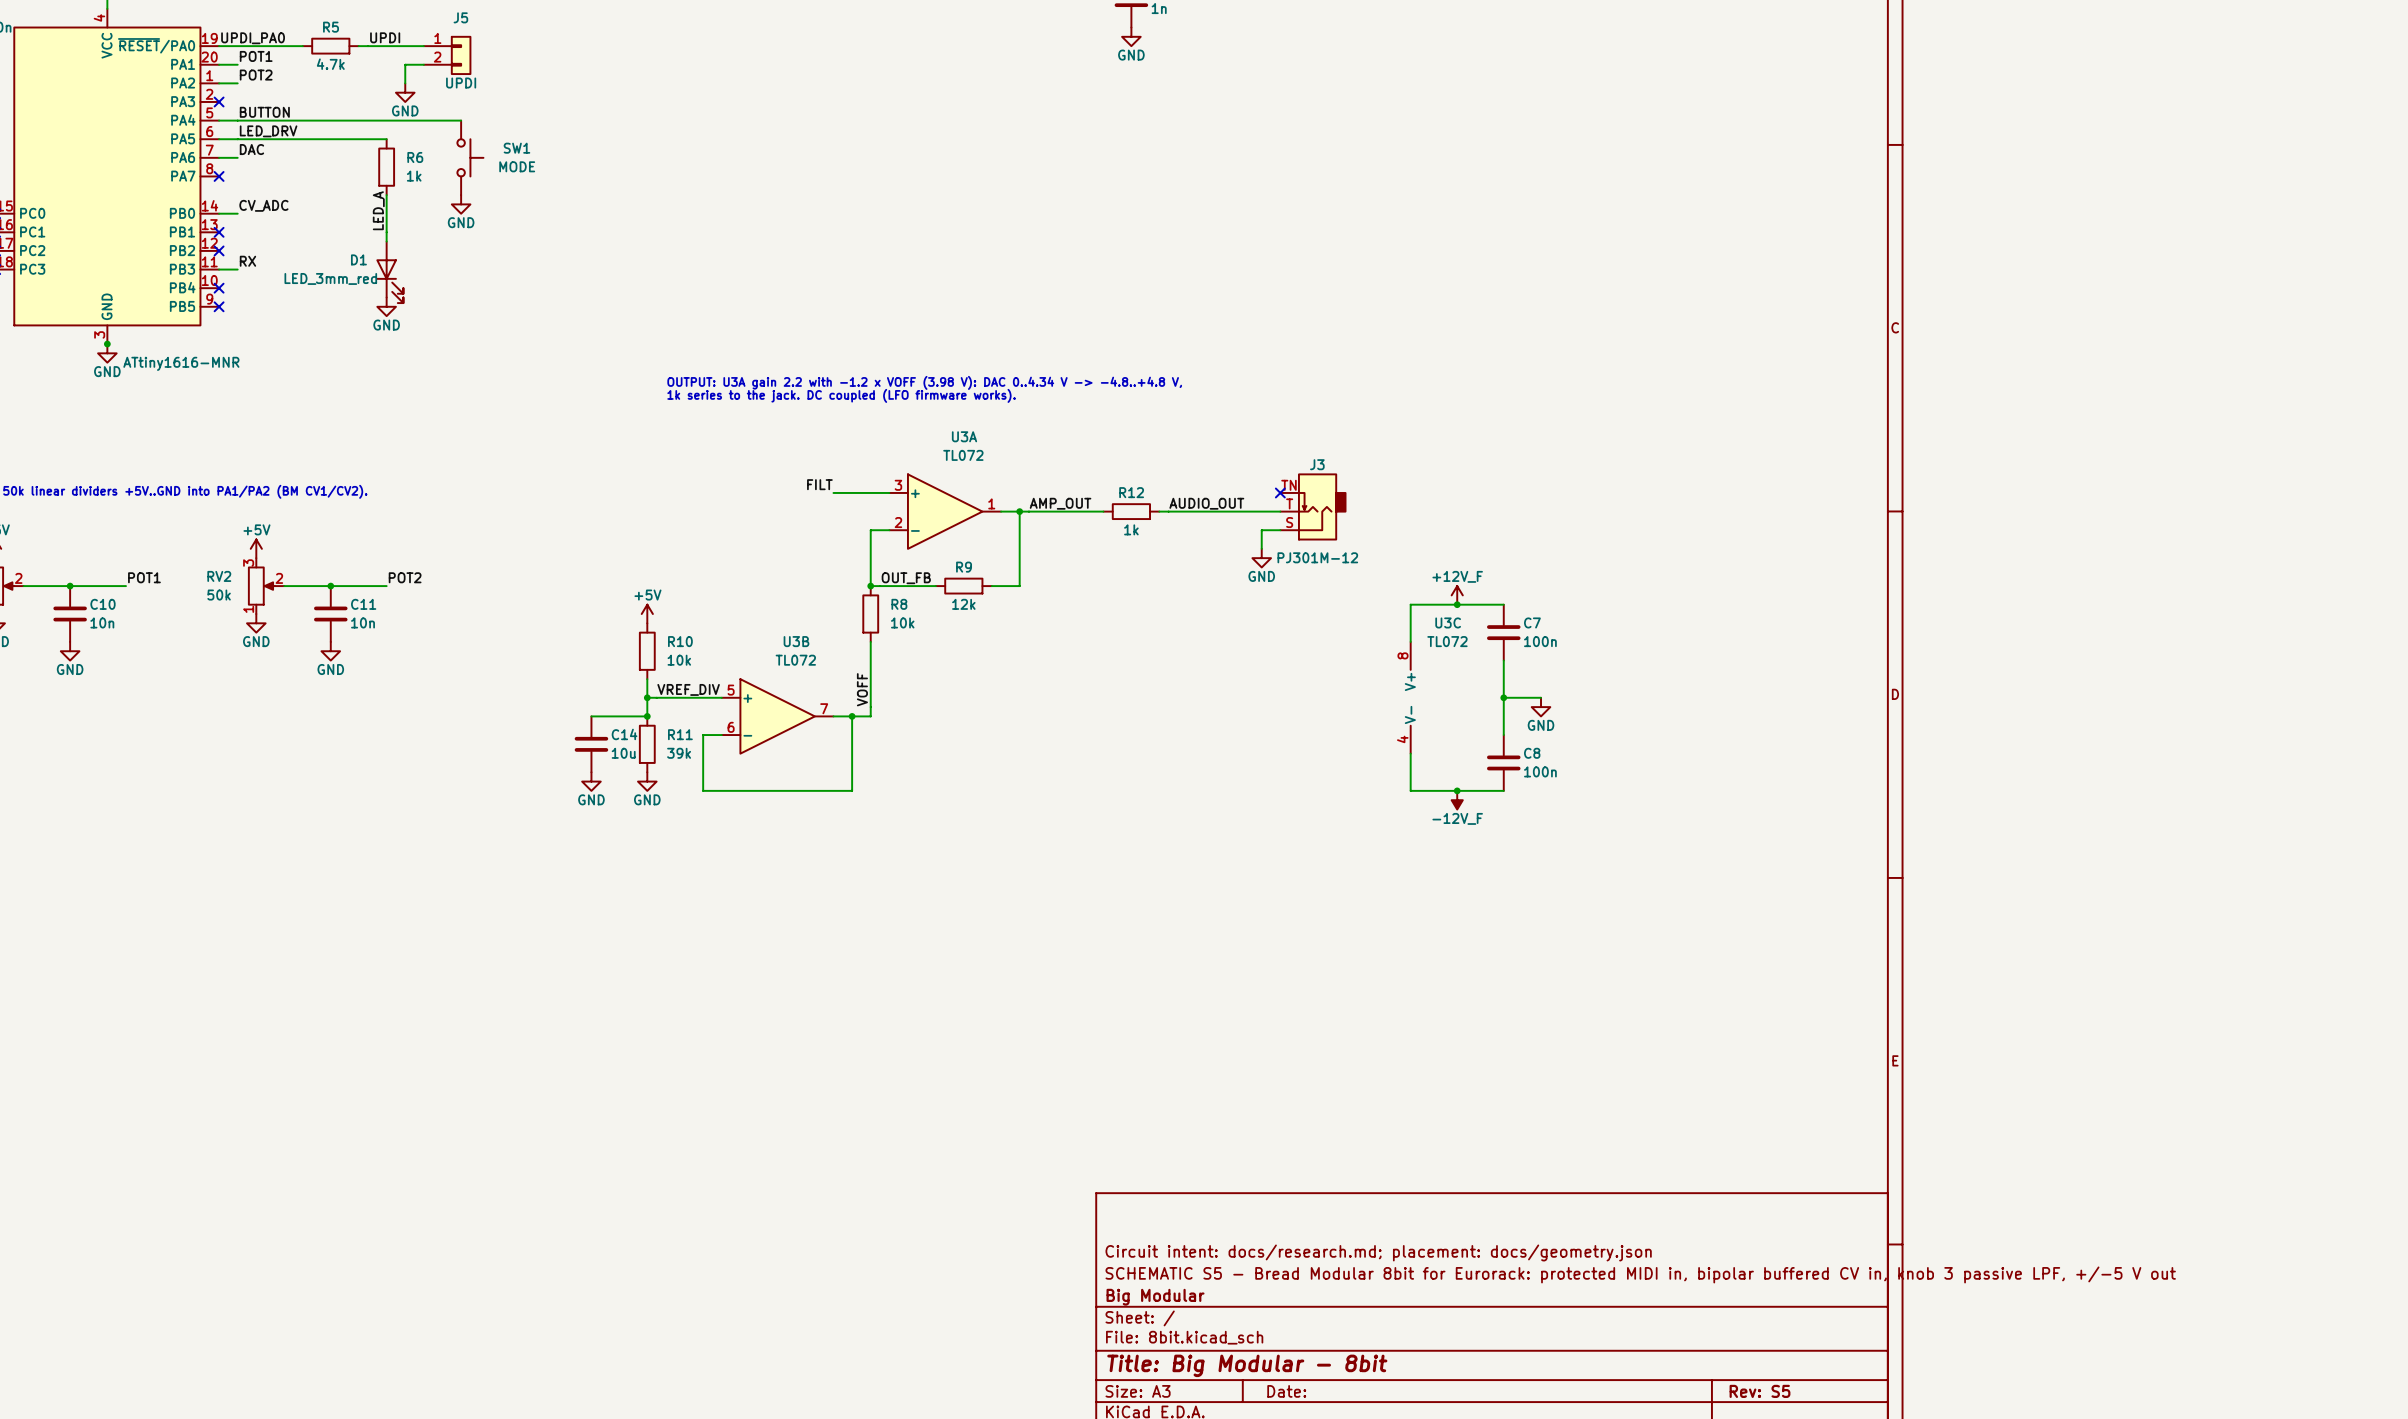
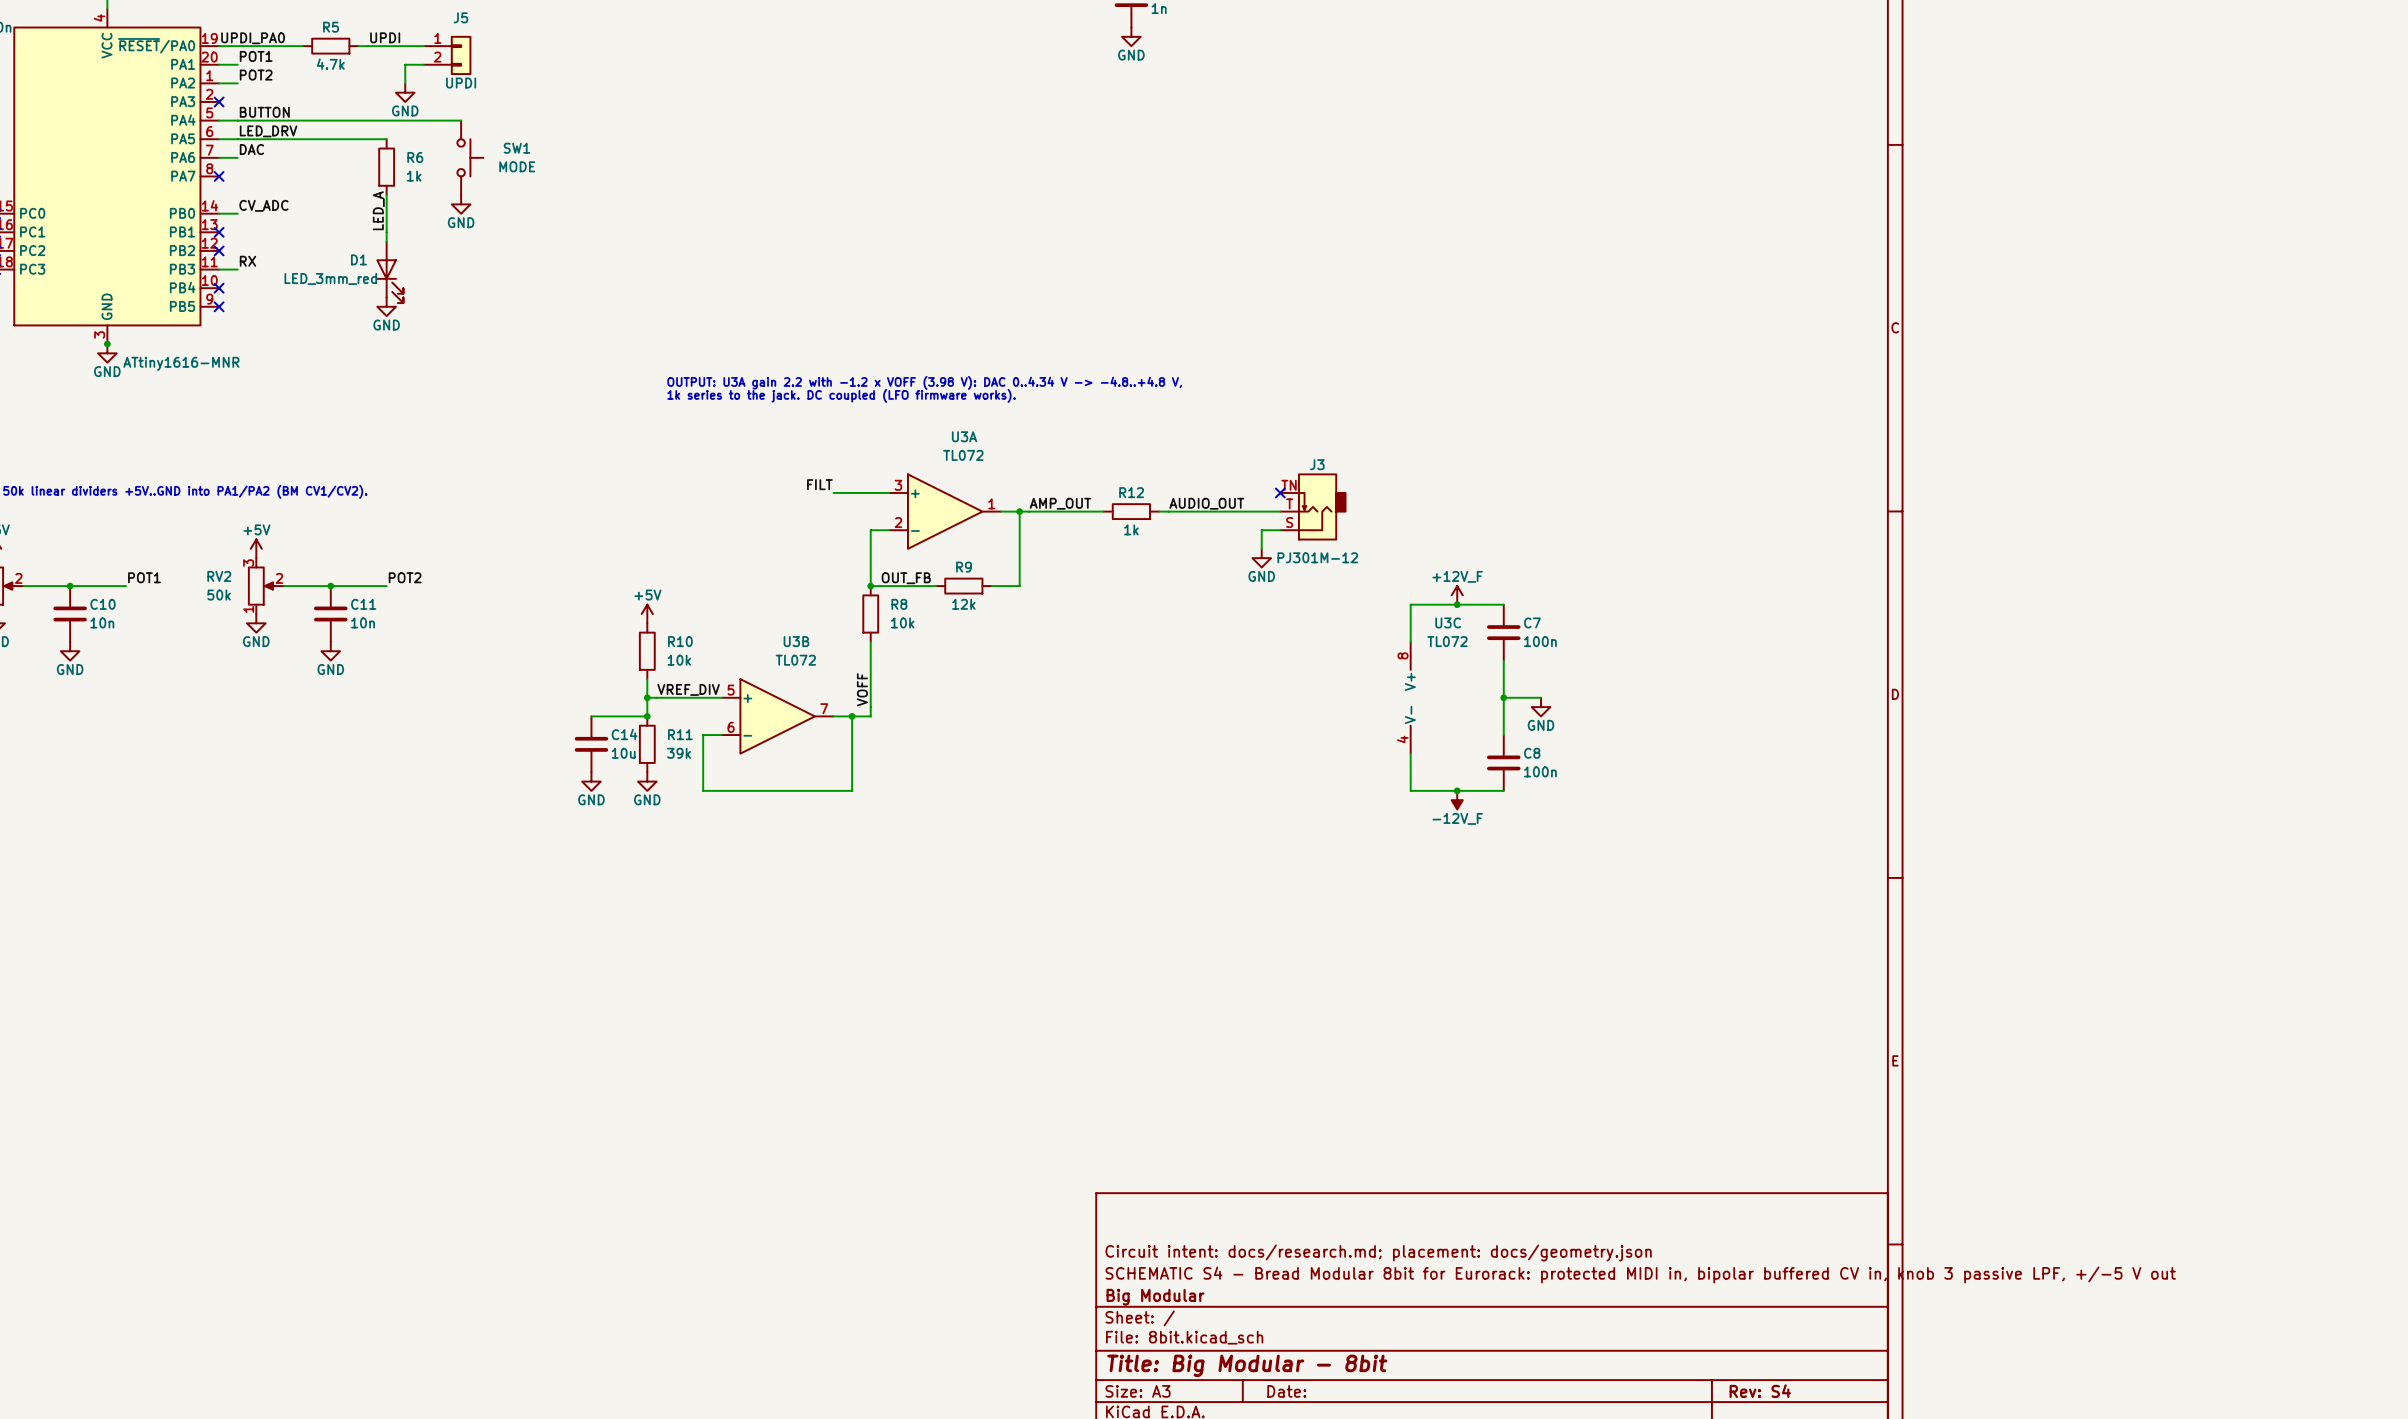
title block: SCHEMATIC S5 - Bread Modular 8bit for Eurorack: protected MIDI in, bipolar buffered CV in, knob 3 passive LPF, +/-5 V out (1640, 1274) -> SCHEMATIC S4 - Bread Modular 8bit for Eurorack: protected MIDI in, bipolar buffered CV in, knob 3 passive LPF, +/-5 V out (1640, 1274)
title block: Rev: S5 (1760, 1391) -> Rev: S4 (1760, 1391)

